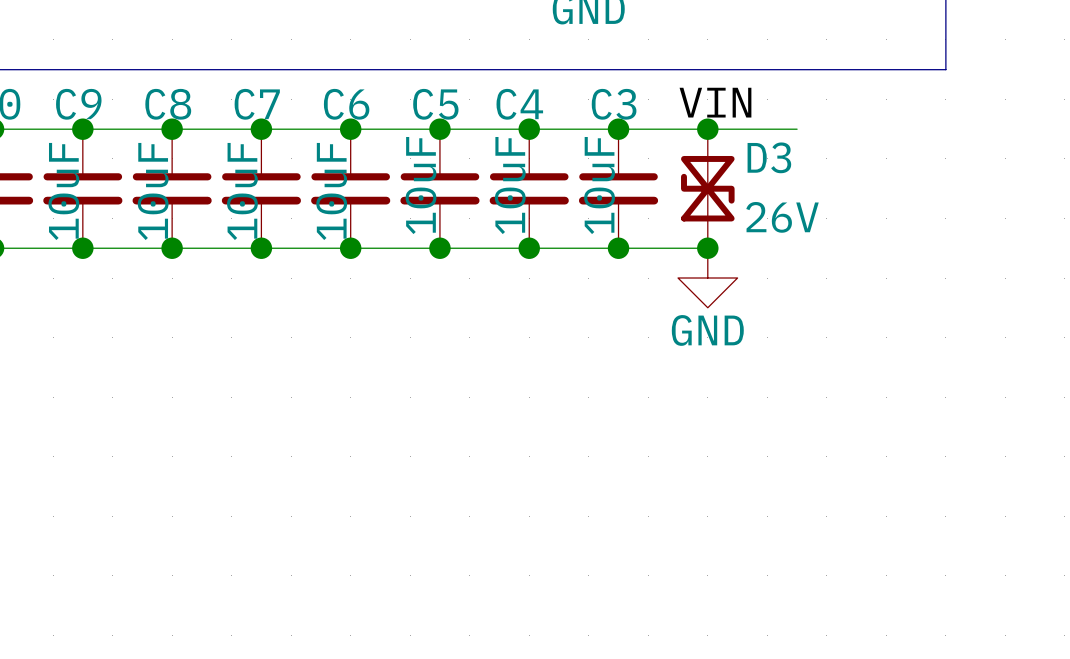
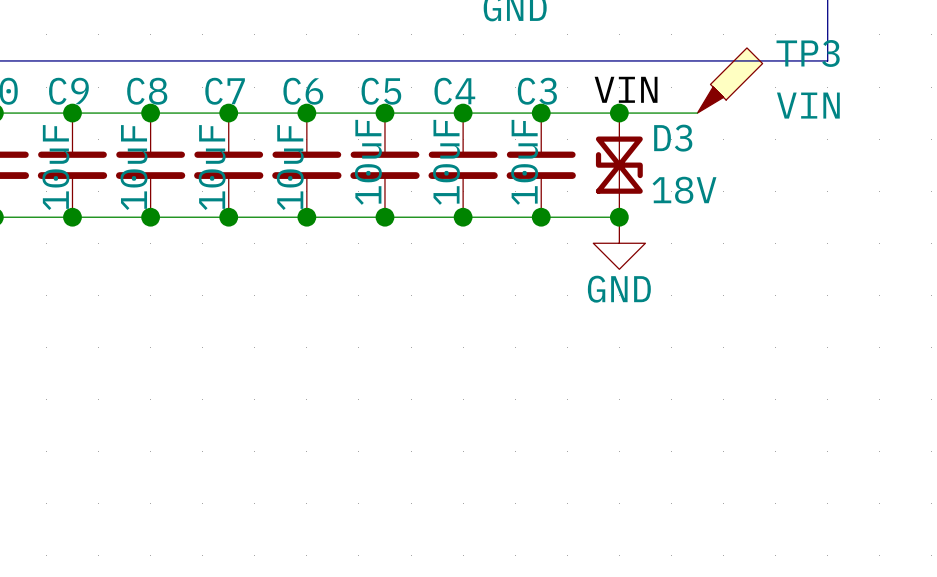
TP3: none -> VIN (730, 80)
D3 value: 26V (782, 217) -> 18V (684, 190)

